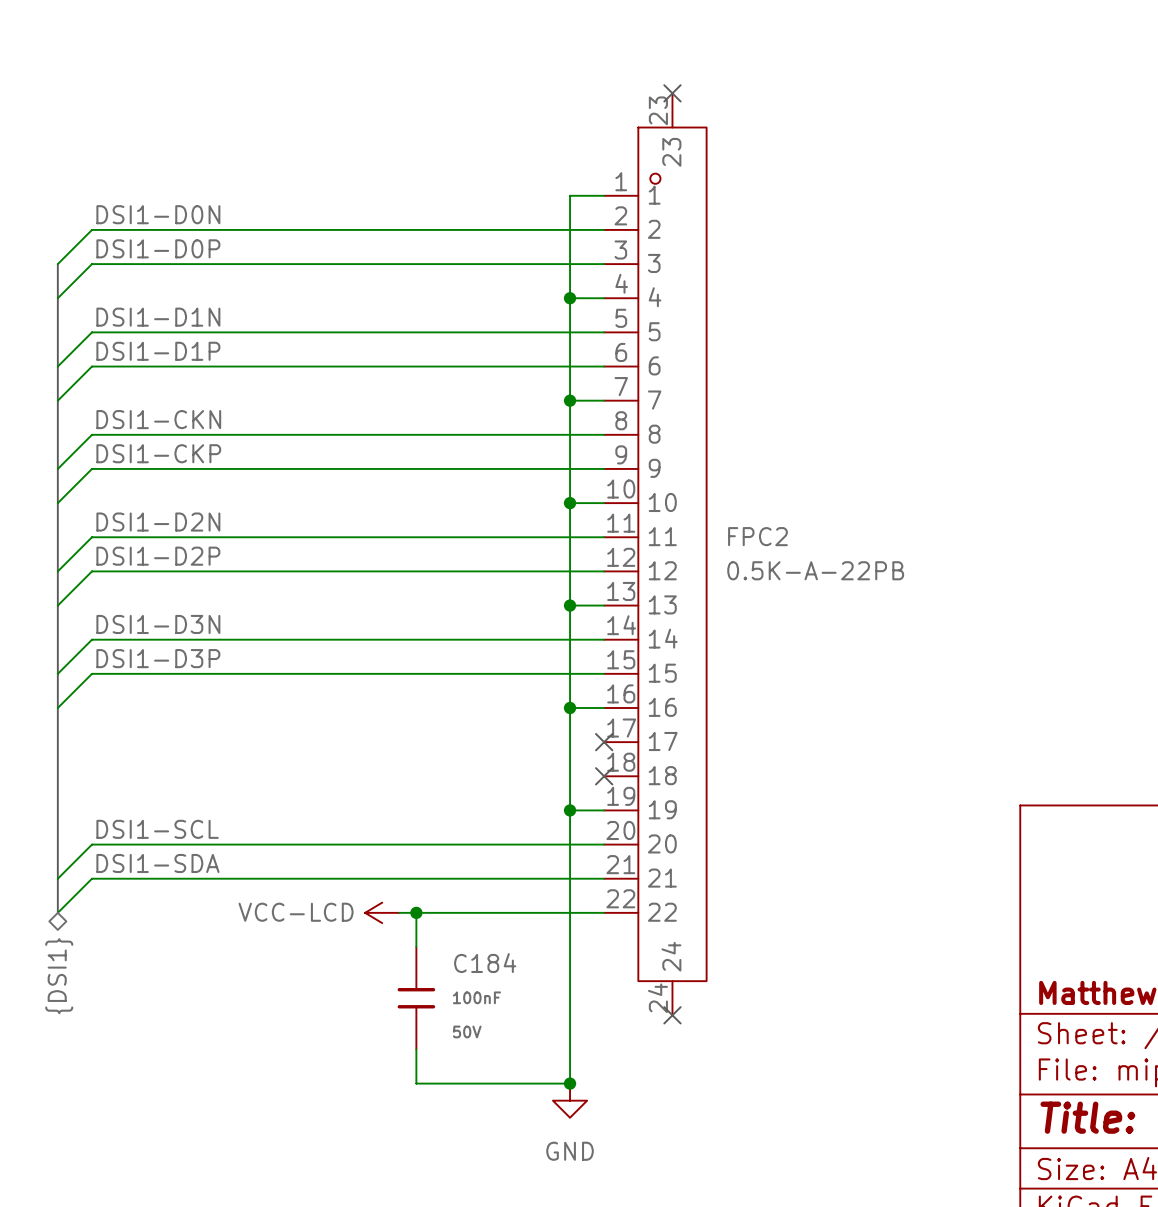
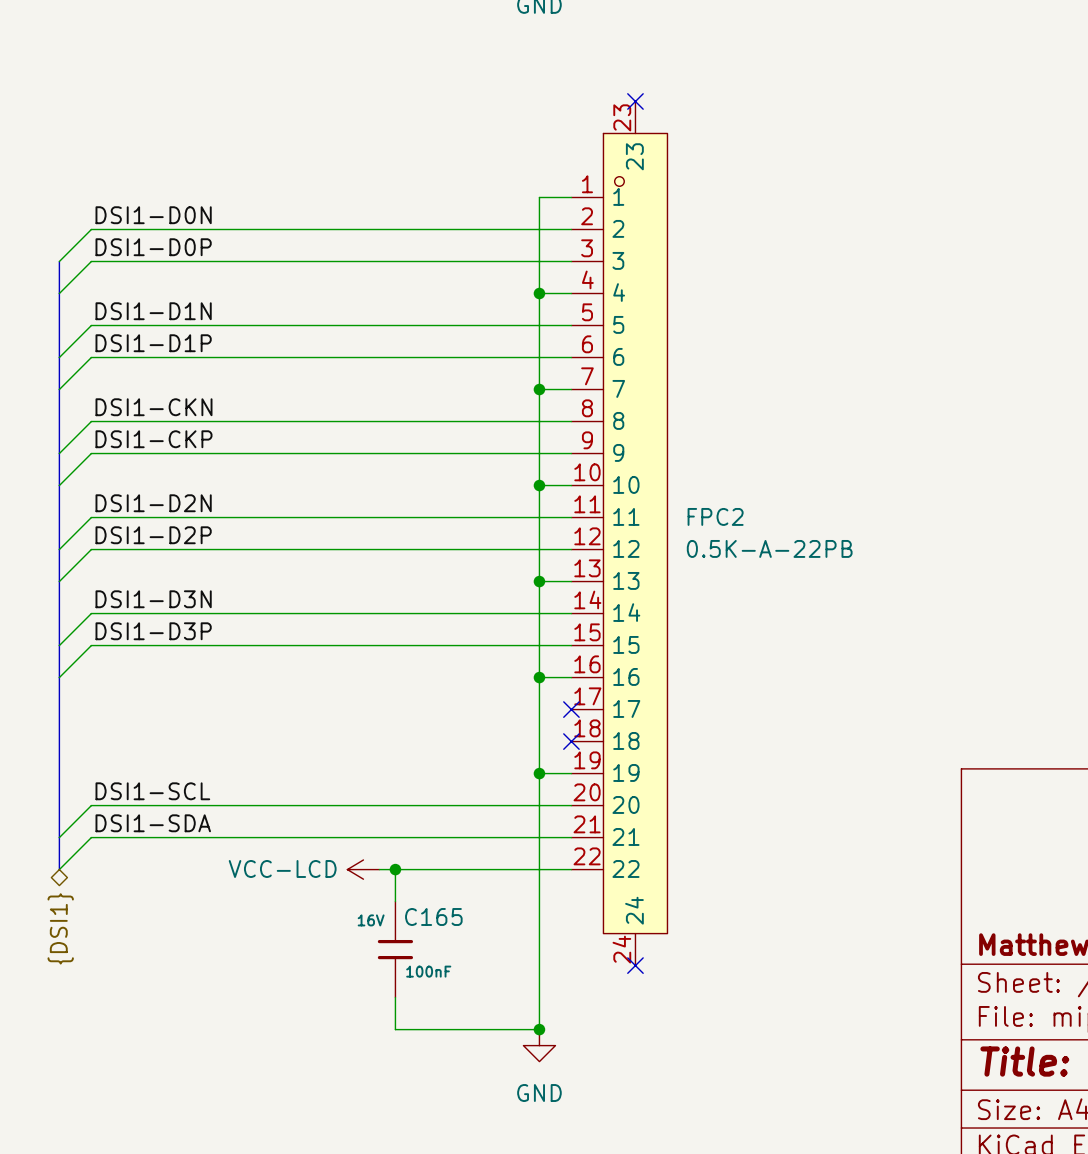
C184 name: C184 (485, 963) -> C165 (433, 916)
C184 value position: 100nF (476, 997) -> 100nF (428, 971)
C184 text: 50V (467, 1031) -> 16V (371, 920)

